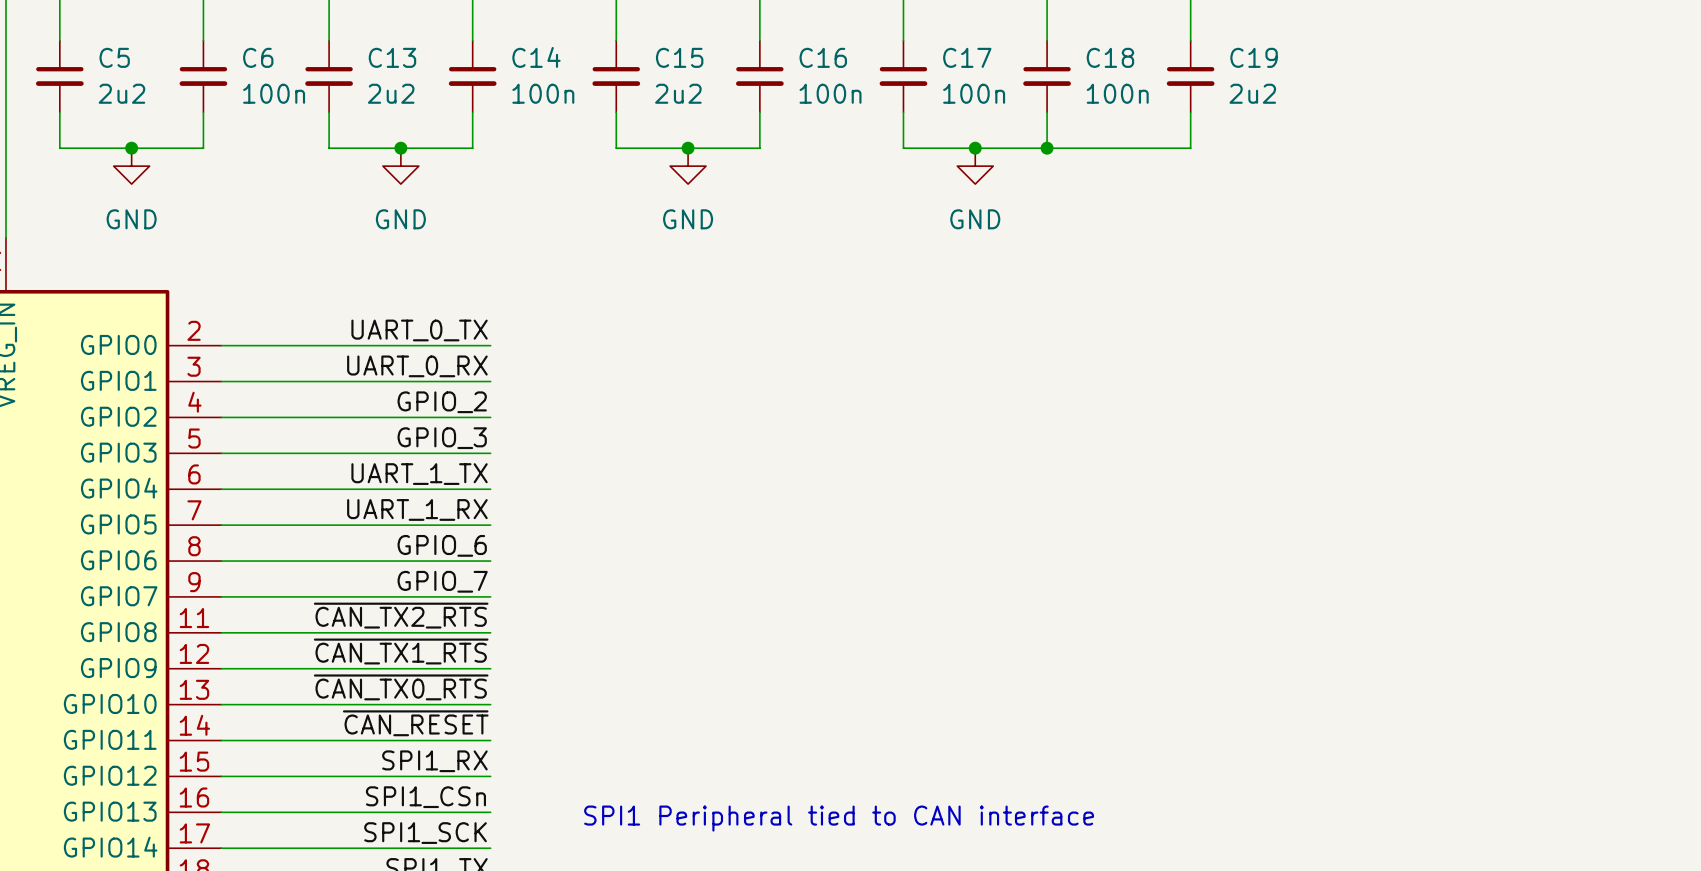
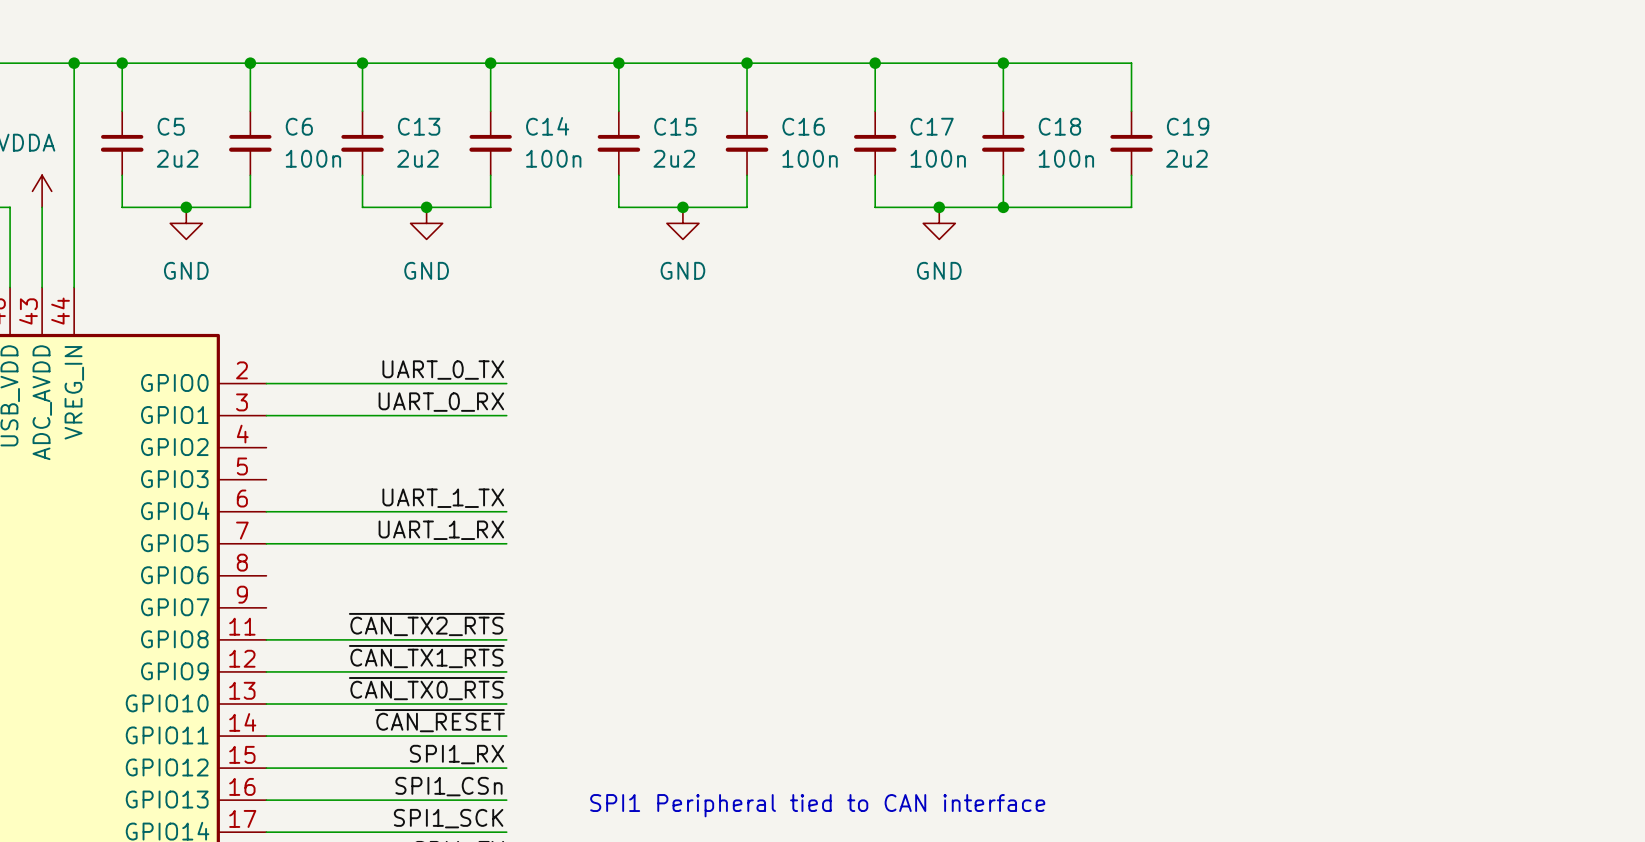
label: GPIO_2 (442, 402) -> none
wire: (221, 417) (490, 417) -> none
label: GPIO_3 (442, 438) -> none
wire: (221, 453) (490, 453) -> none
label: GPIO_6 (442, 545) -> none
wire: (221, 561) (490, 561) -> none
label: GPIO_7 (442, 581) -> none
wire: (221, 596) (490, 596) -> none

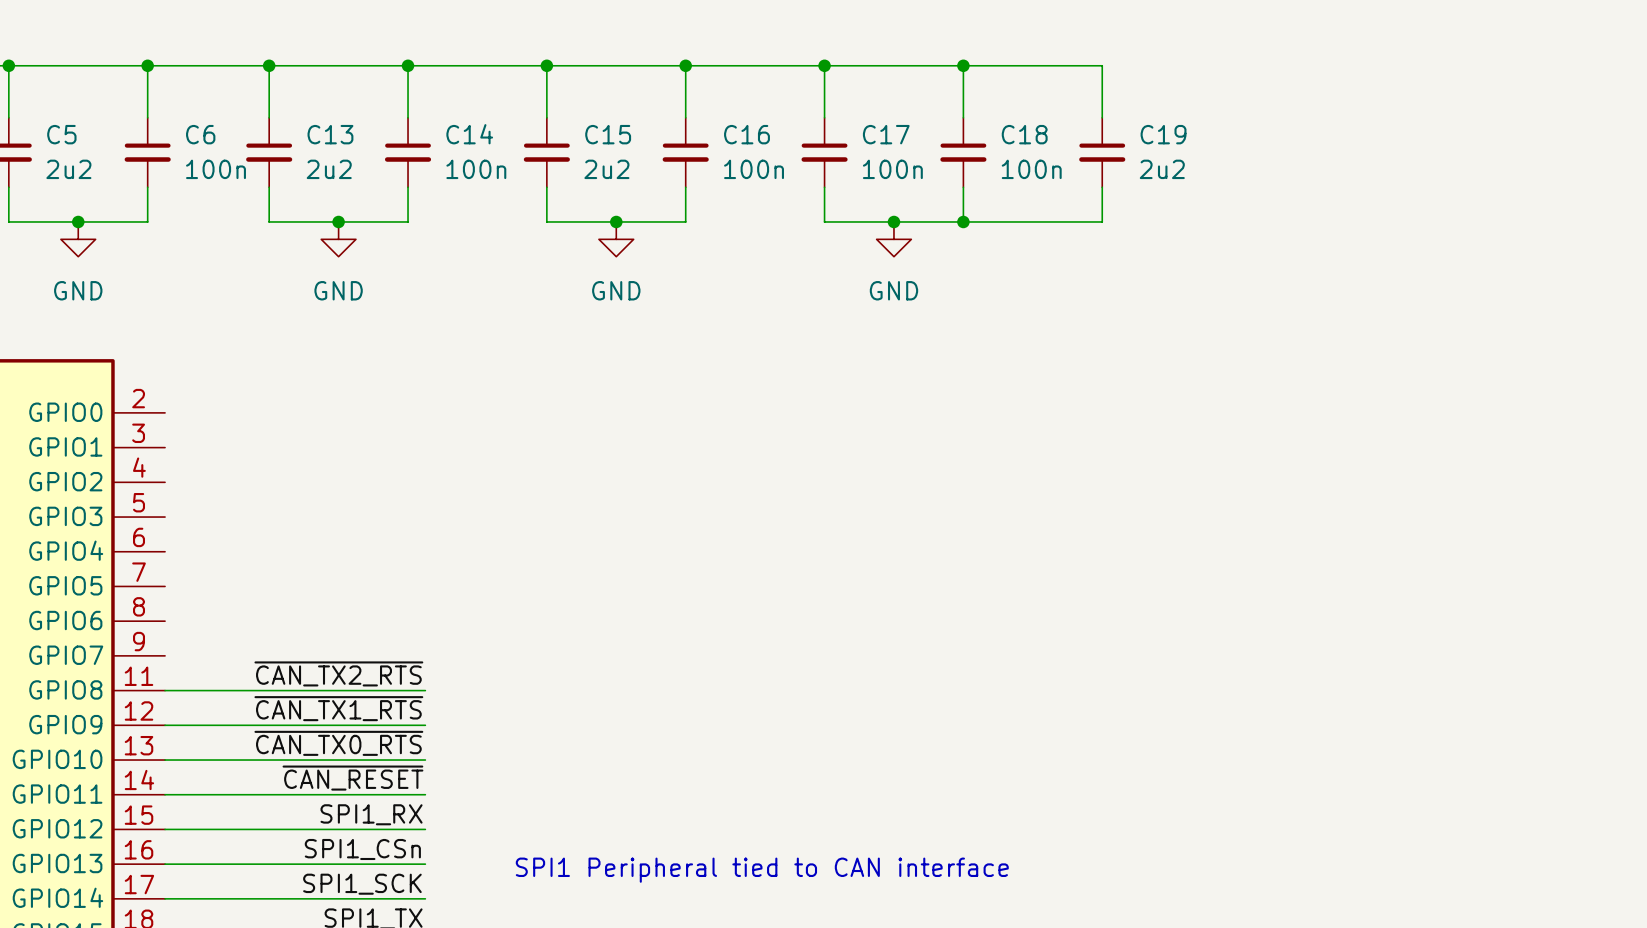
label: UART_0_TX (443, 370) -> none
wire: (266, 383) (506, 383) -> none
label: UART_0_RX (441, 402) -> none
wire: (266, 415) (506, 415) -> none
label: UART_1_TX (443, 498) -> none
wire: (266, 511) (506, 511) -> none
label: UART_1_RX (441, 530) -> none
wire: (266, 543) (506, 543) -> none

